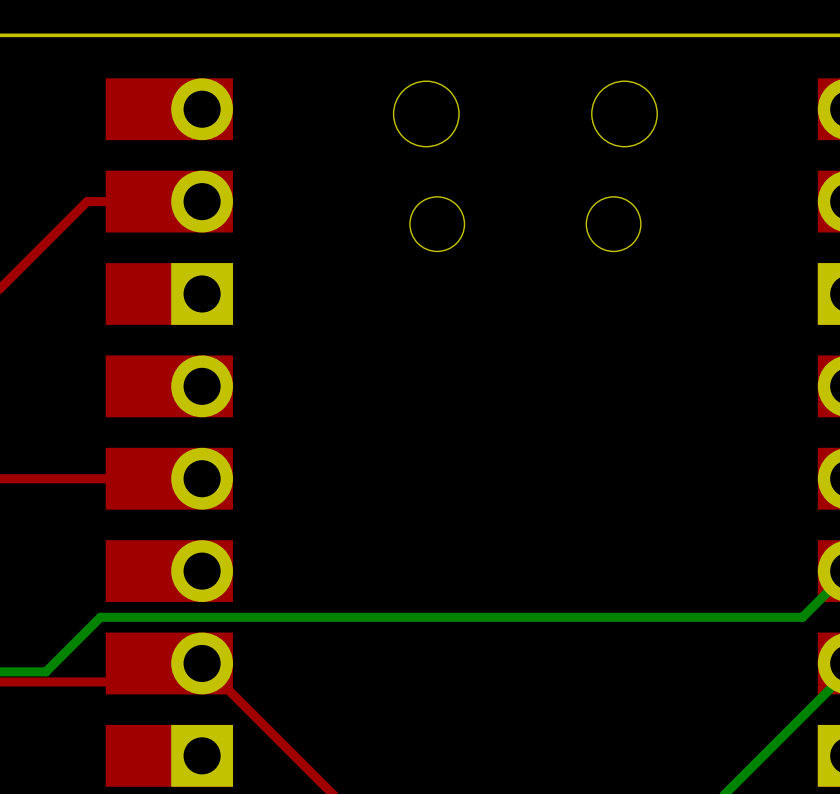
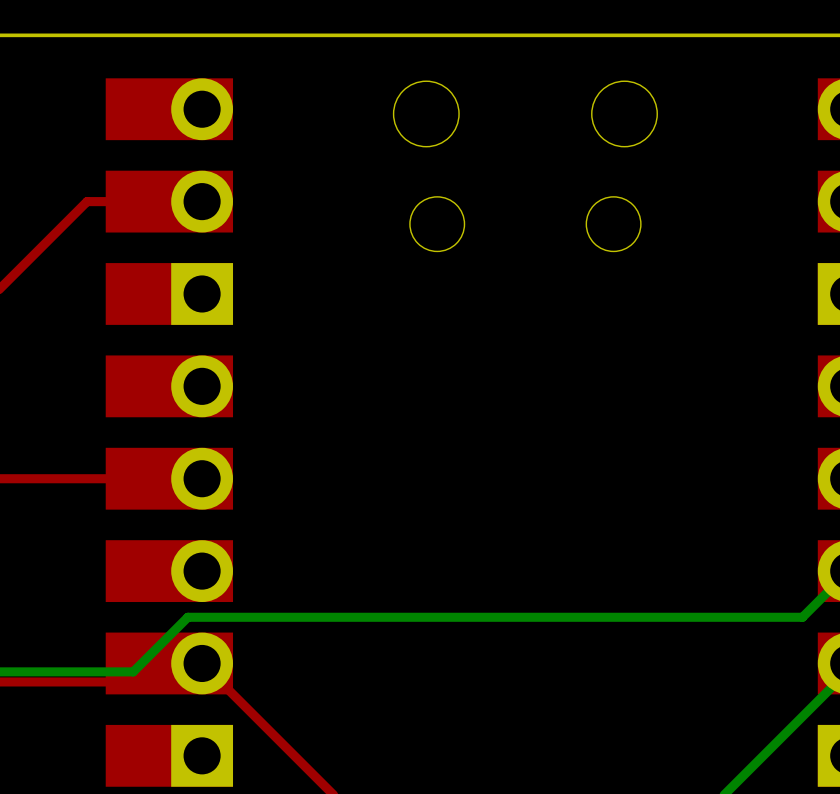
bottom track: (187, 617) (100, 617) (45, 671) -> (187, 617) (133, 671) (45, 671)

